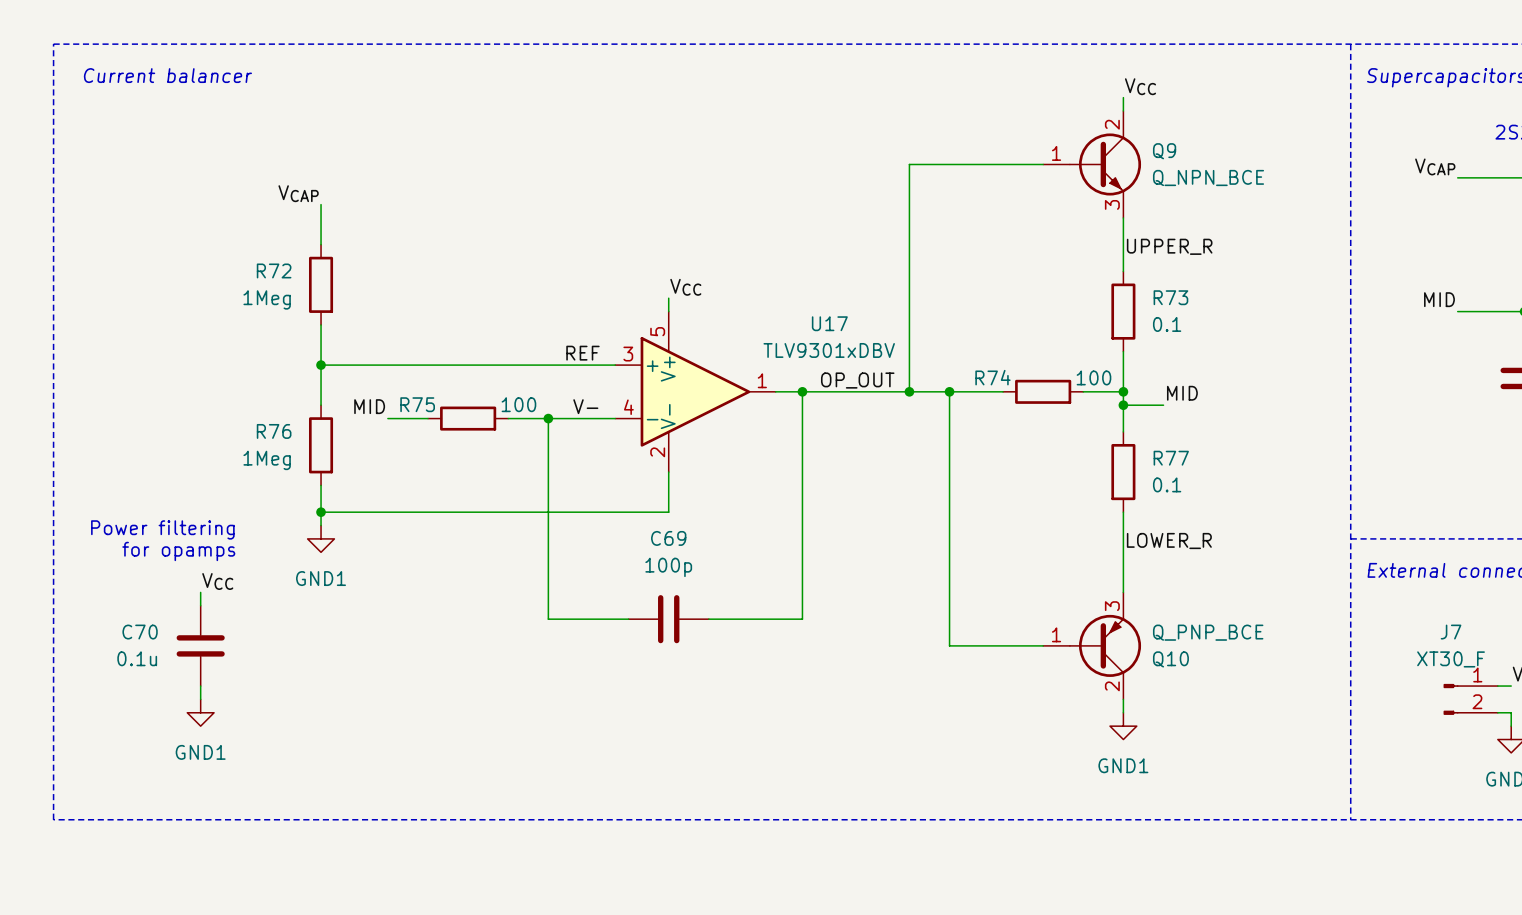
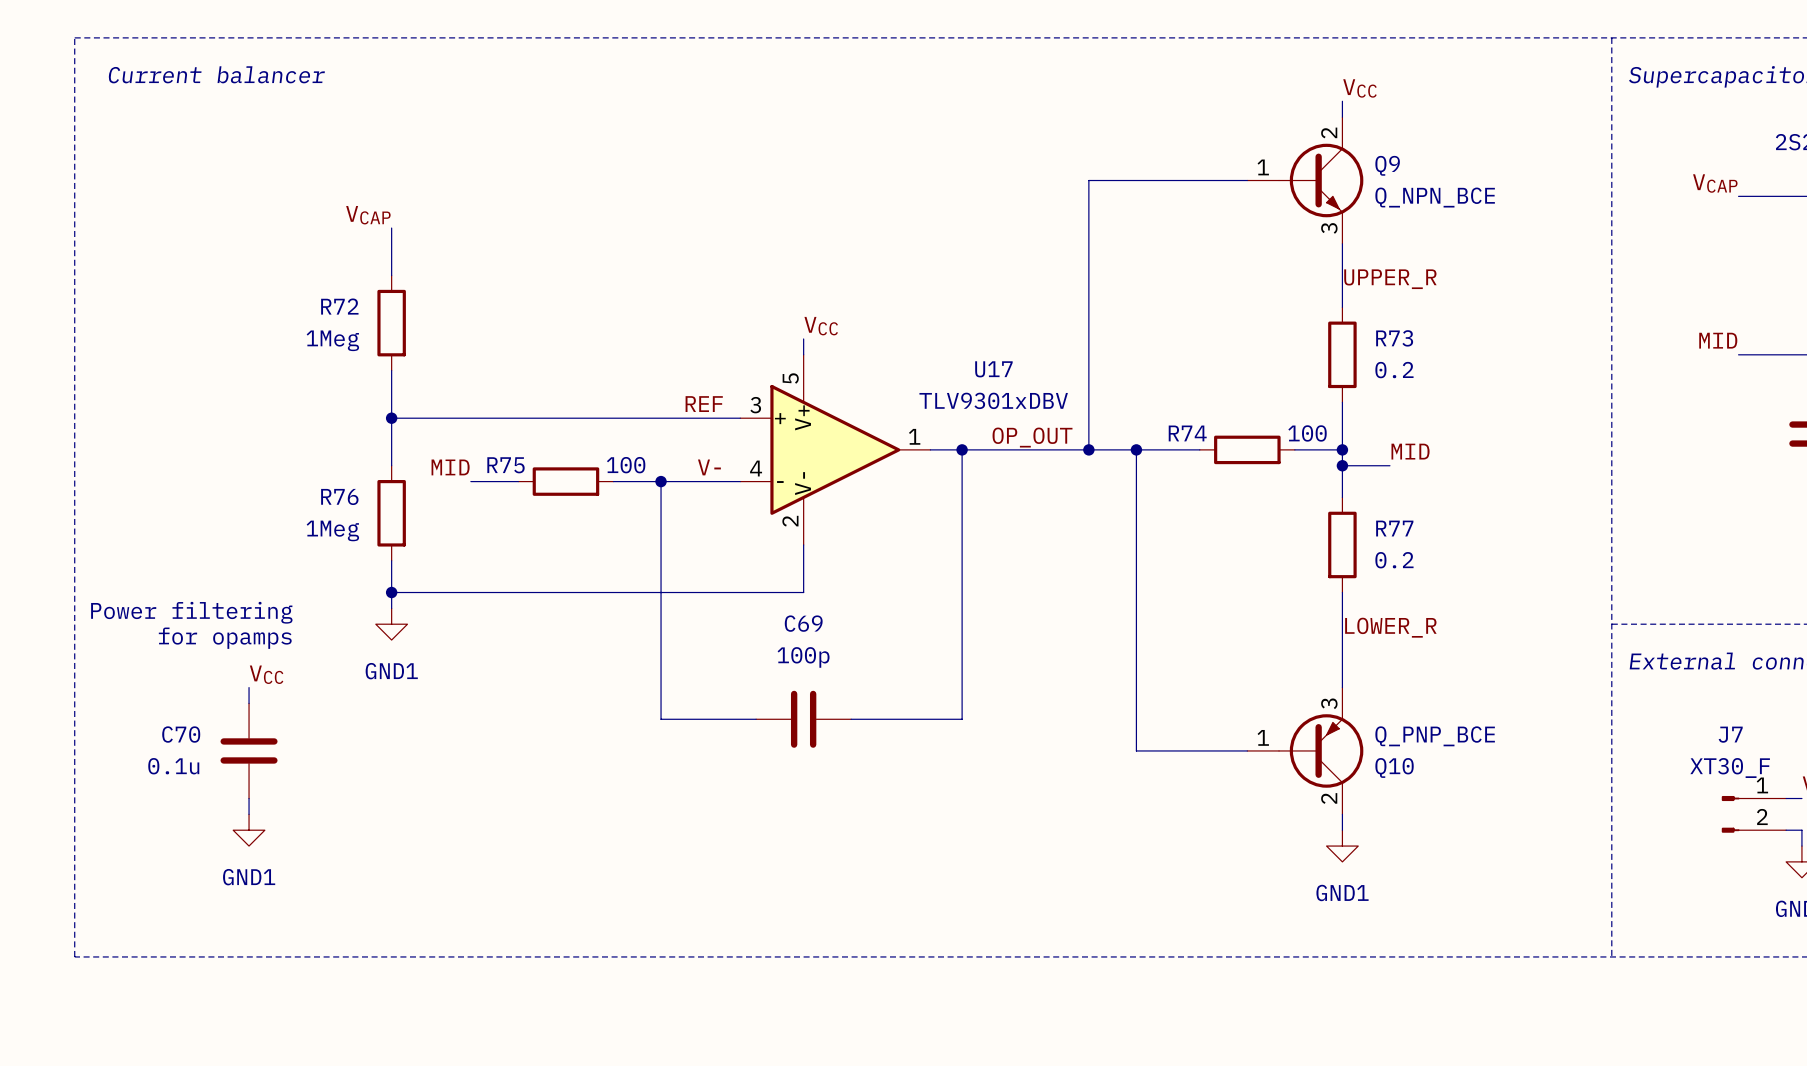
R73 value: 0.1 (1167, 324) -> 0.2 (1394, 370)
R77 value: 0.1 (1167, 484) -> 0.2 (1394, 560)

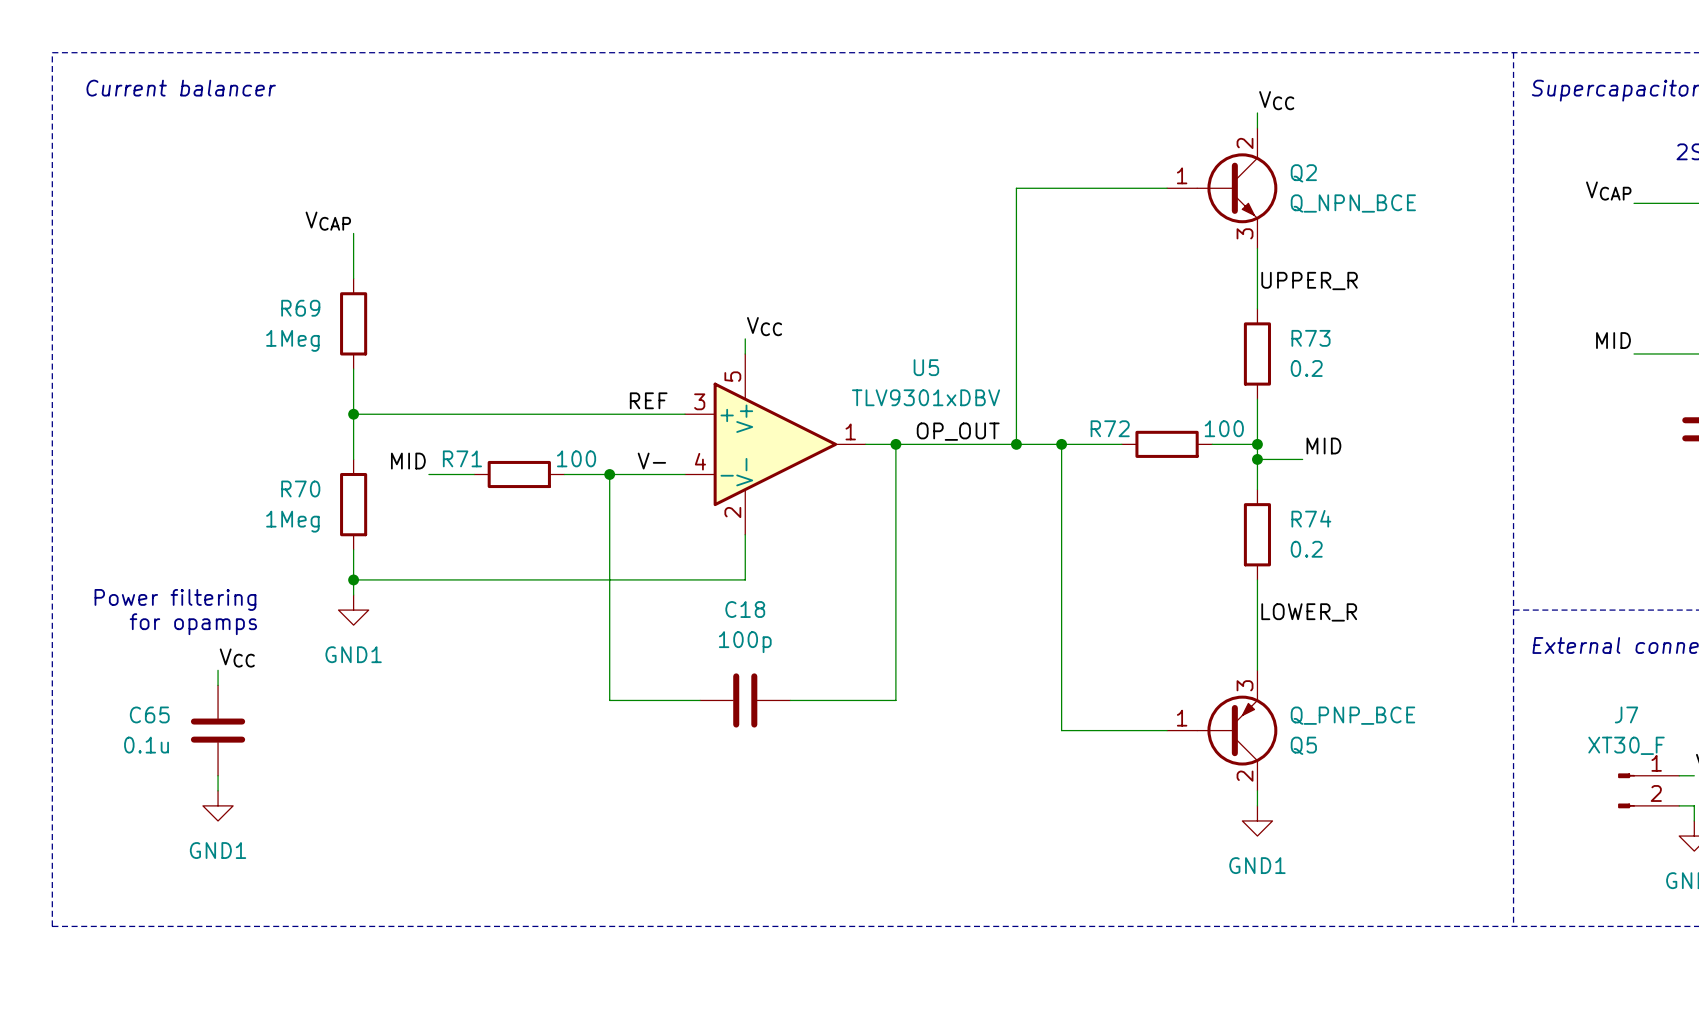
Q9 name: Q9 (1387, 165) -> Q2 (1303, 173)
R72 name: R72 (339, 306) -> R69 (300, 308)
U17 name: U17 (993, 369) -> U5 (926, 367)
R74 name: R74 (1187, 433) -> R72 (1110, 428)
R75 name: R75 (505, 465) -> R71 (462, 458)
R76 name: R76 (339, 496) -> R70 (300, 489)
R77 name: R77 (1394, 528) -> R74 (1311, 518)
C69 name: C69 (803, 623) -> C18 (745, 609)
C70 name: C70 (181, 734) -> C65 (149, 714)
Q10 name: Q10 (1394, 767) -> Q5 (1303, 745)

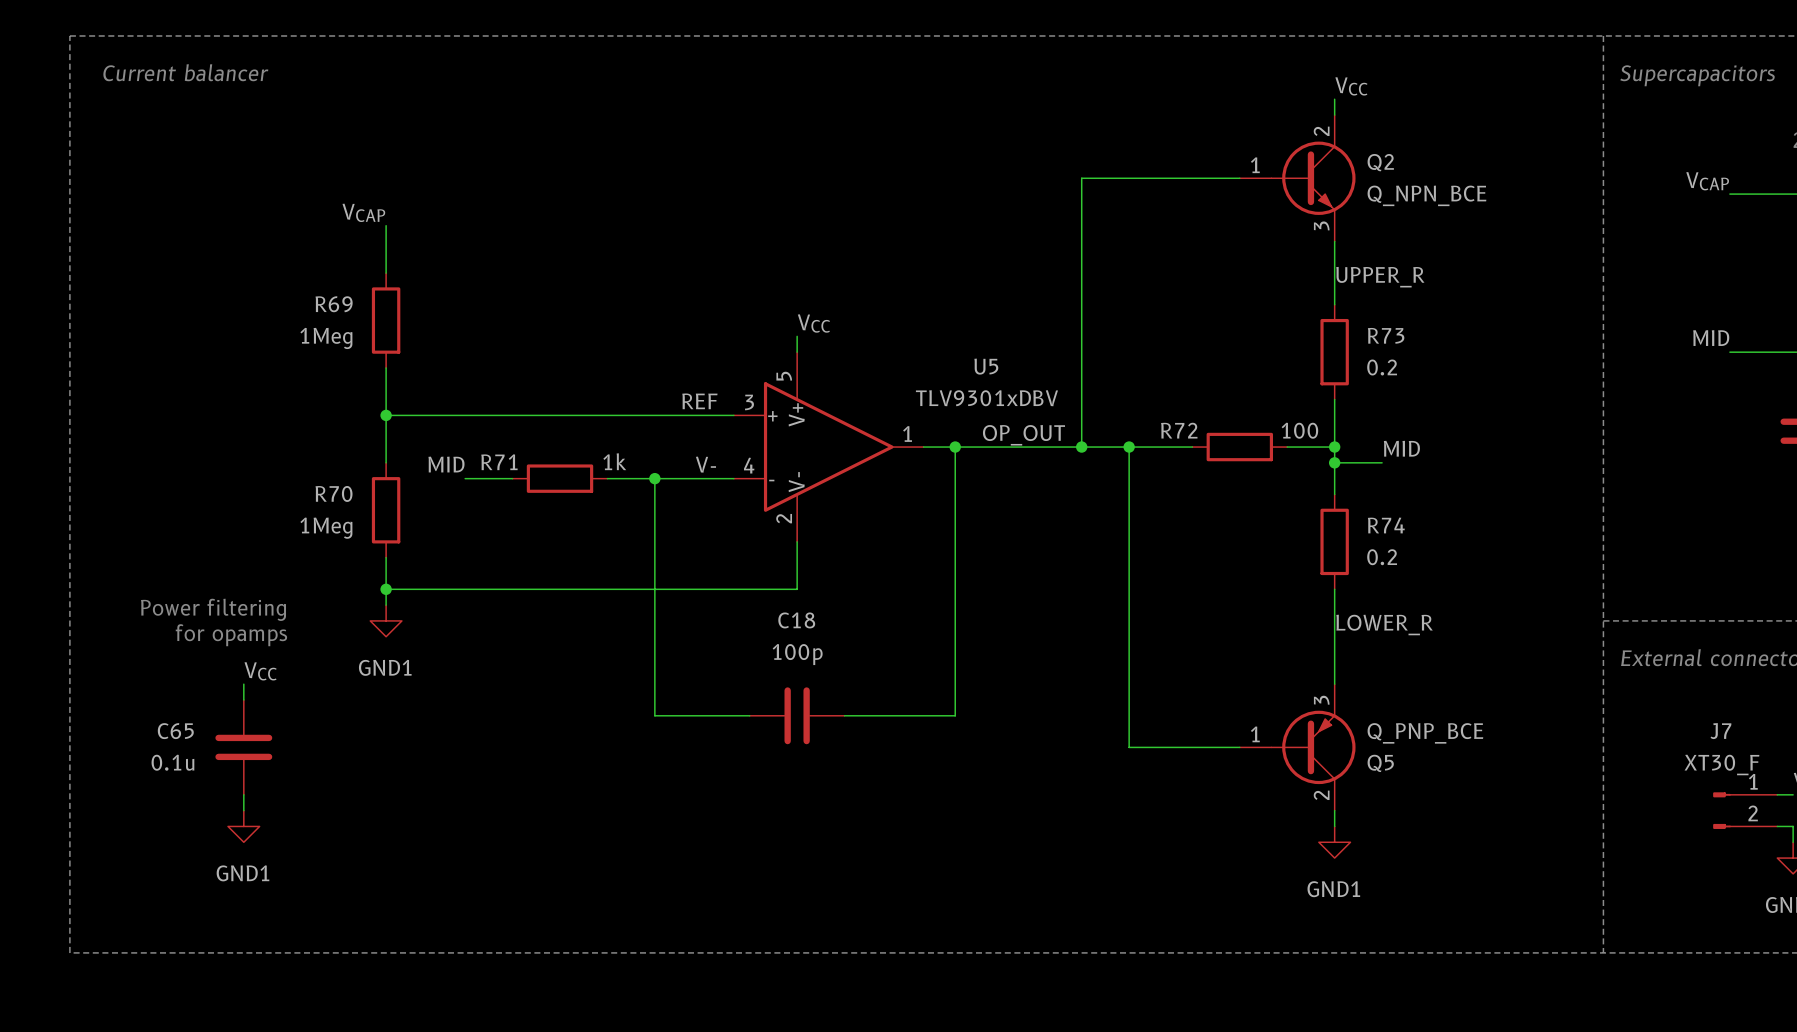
R71 value: 100 (576, 458) -> 1k (614, 461)

